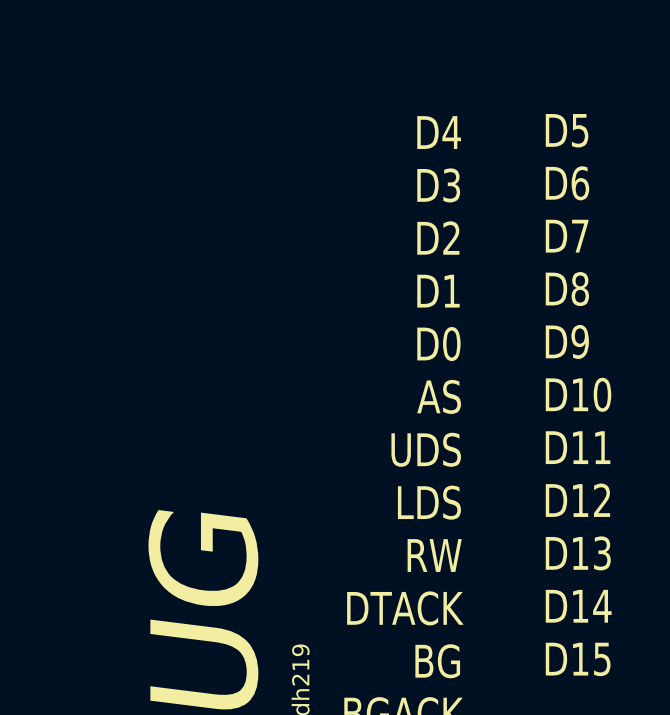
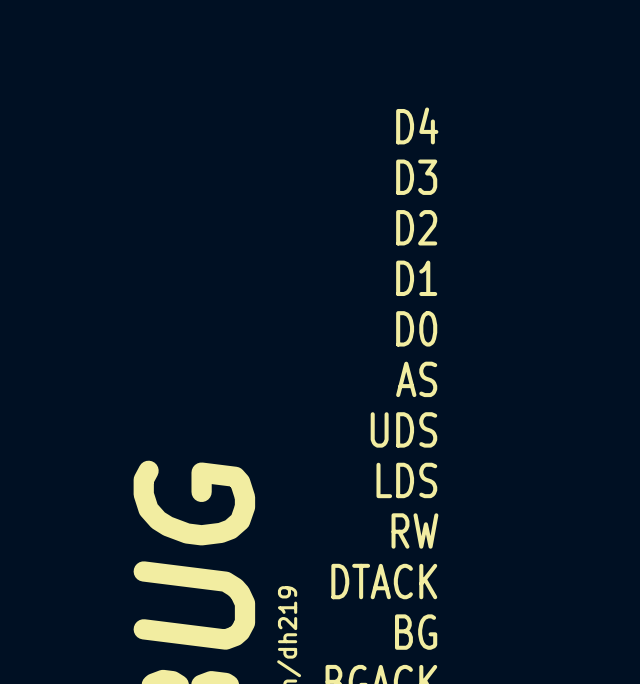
text: D5 (567, 130) -> none
text: D6 (567, 183) -> none
text: D7 (567, 236) -> none
text: D8 (567, 289) -> none
text: D9 (567, 341) -> none
text: D10 (578, 394) -> none
text: D11 (578, 447) -> none
text: D12 (577, 500) -> none
text: D13 (578, 553) -> none
text: D14 (578, 606) -> none
text: D15 (578, 659) -> none

